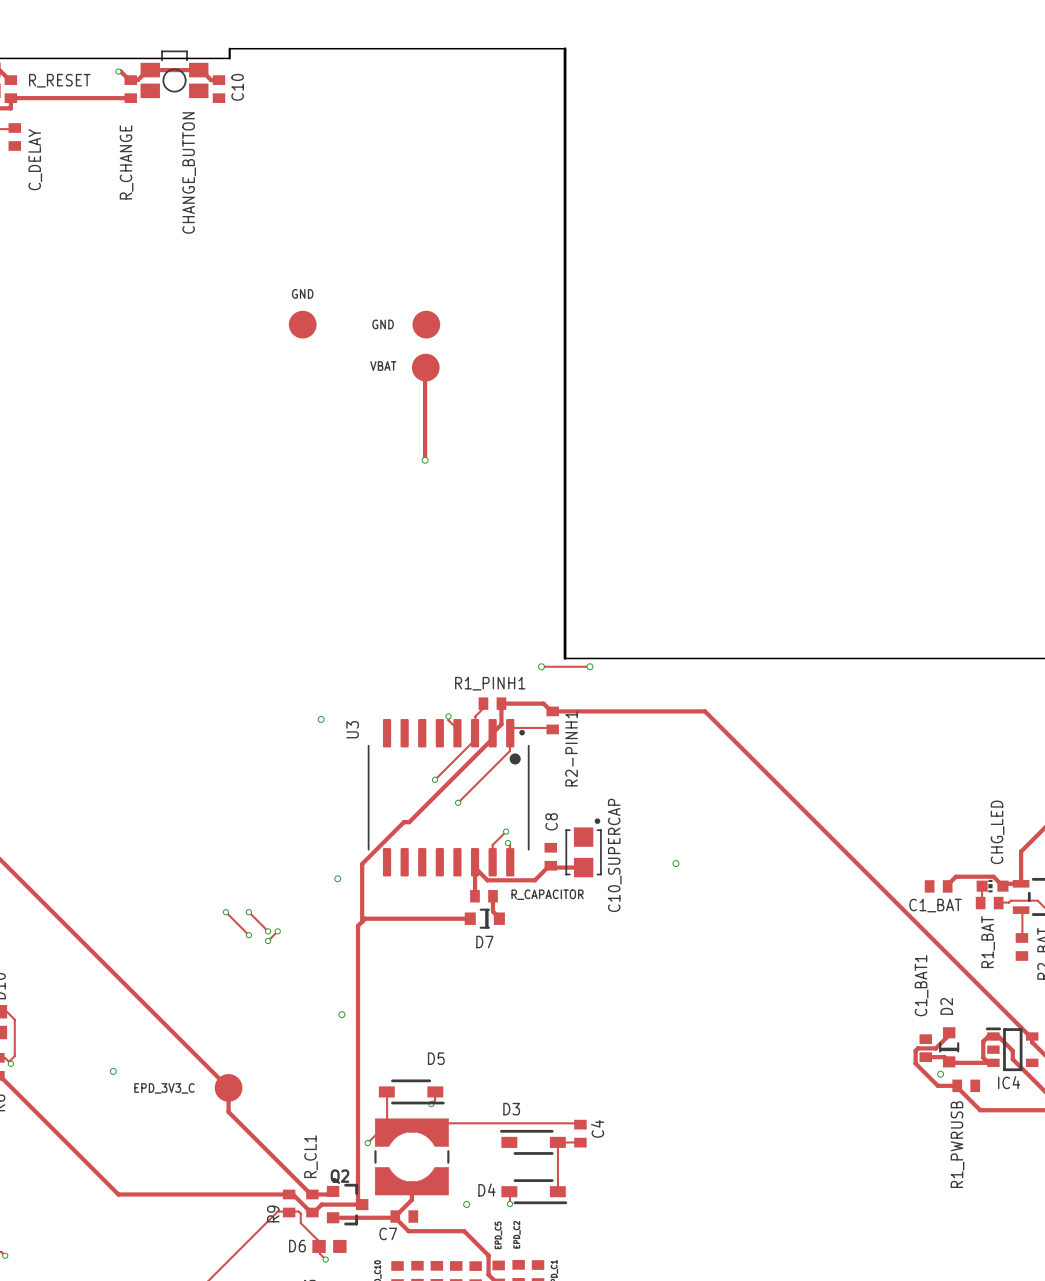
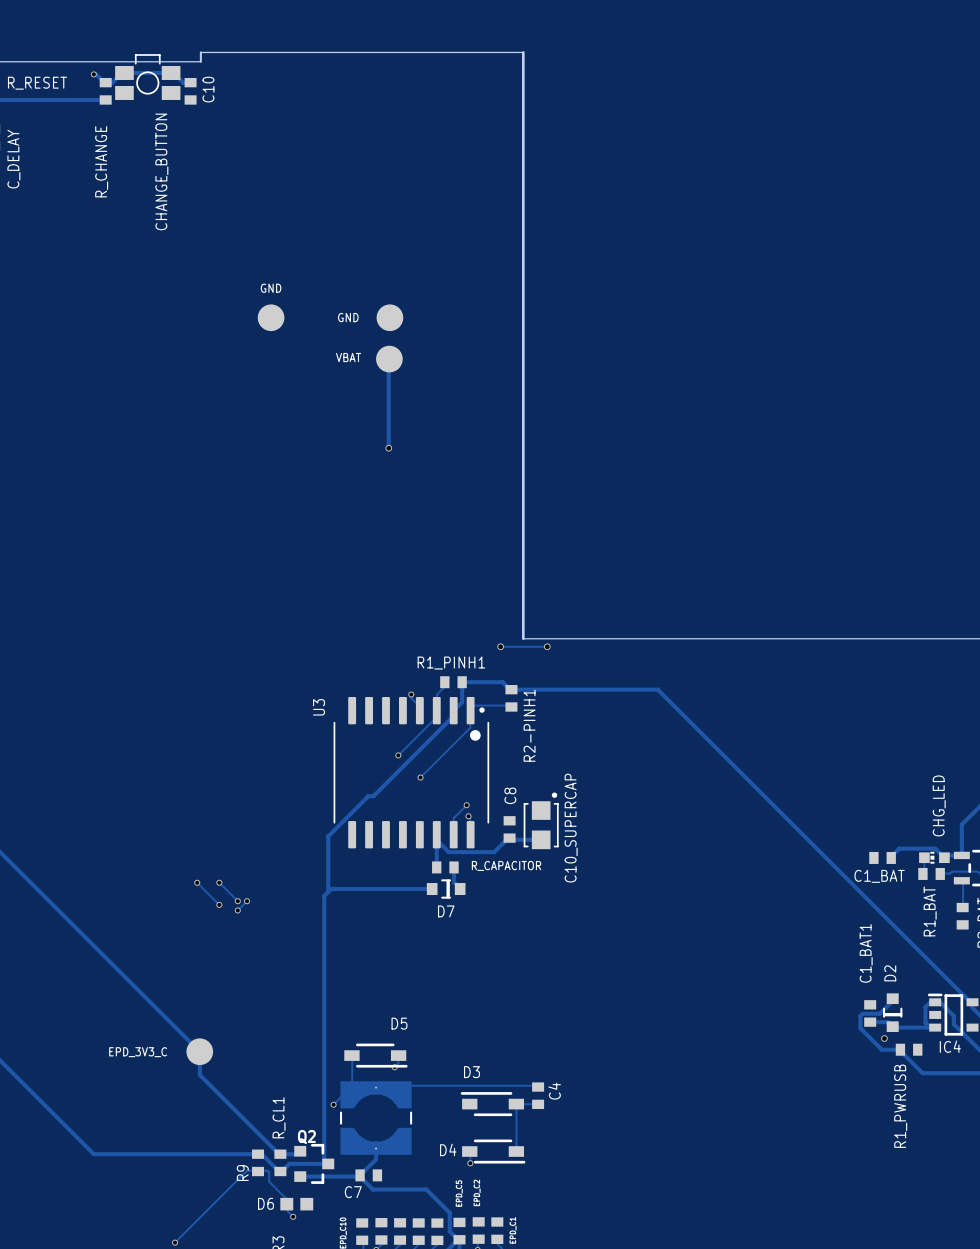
via: (321, 719) -> none
via: (675, 863) -> none
via: (337, 878) -> none
via: (341, 1014) -> none
via: (113, 1071) -> none
via: (466, 1204) -> none

